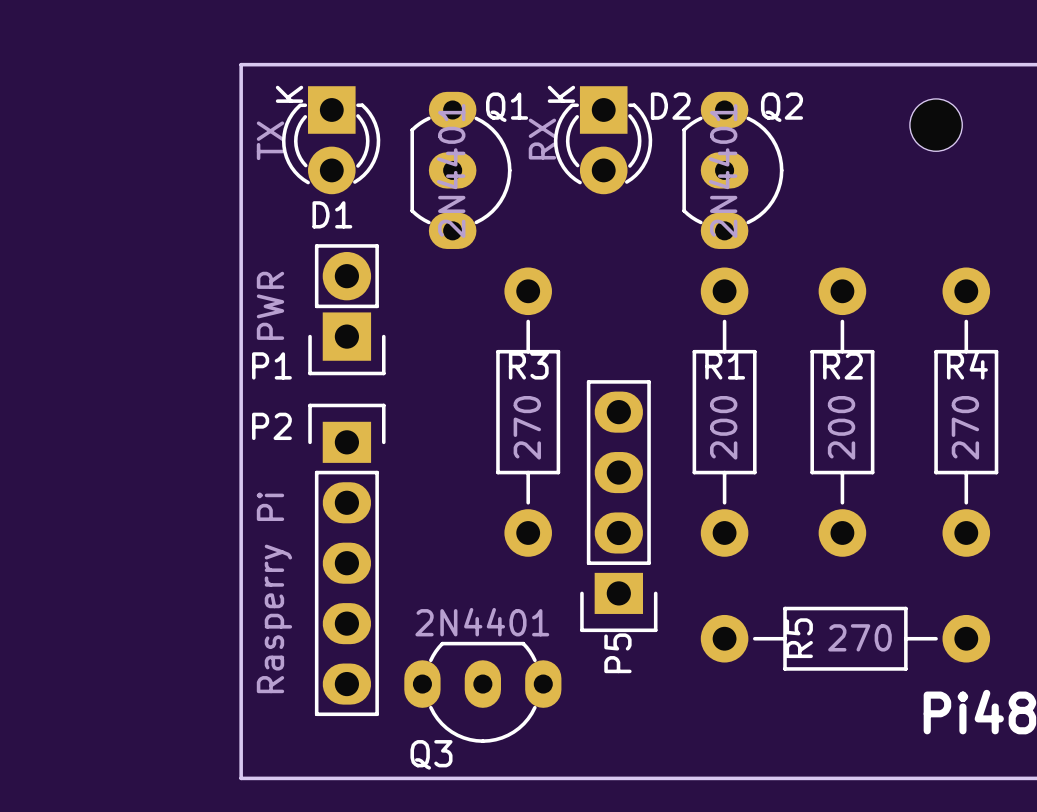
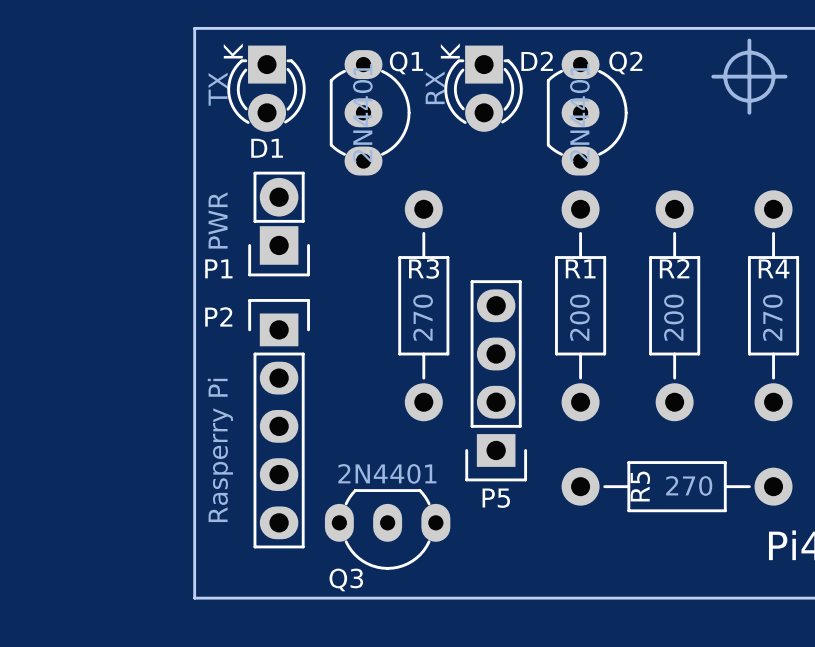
line: none -> (749, 40) (749, 112)
drawing: none -> [723, 50, 776, 103]
line: none -> (713, 76) (785, 76)
part: (936, 125) -> none
P5 name rotation: 0° (617, 653) -> 90° clockwise (496, 498)

